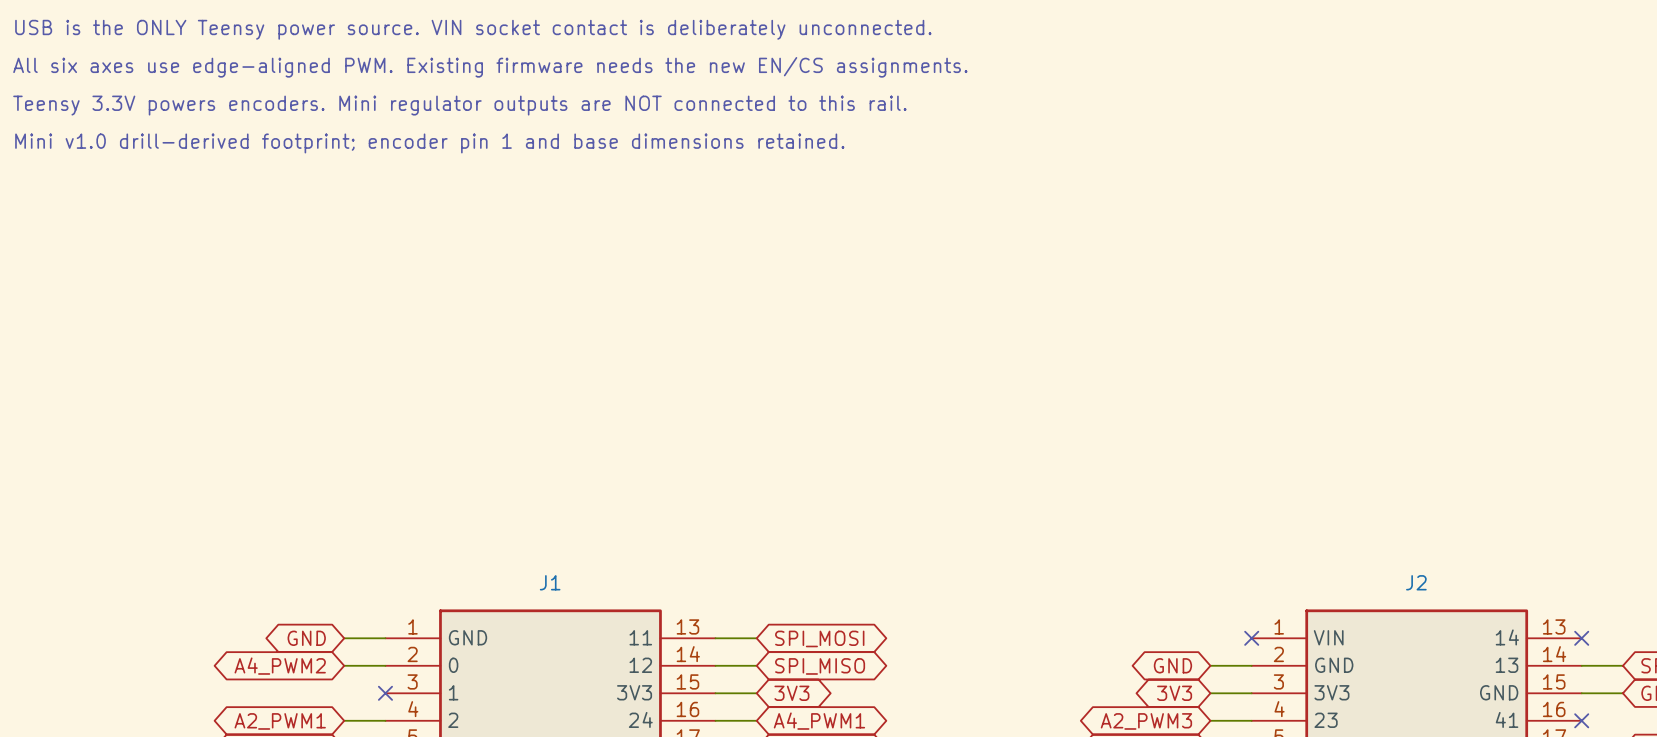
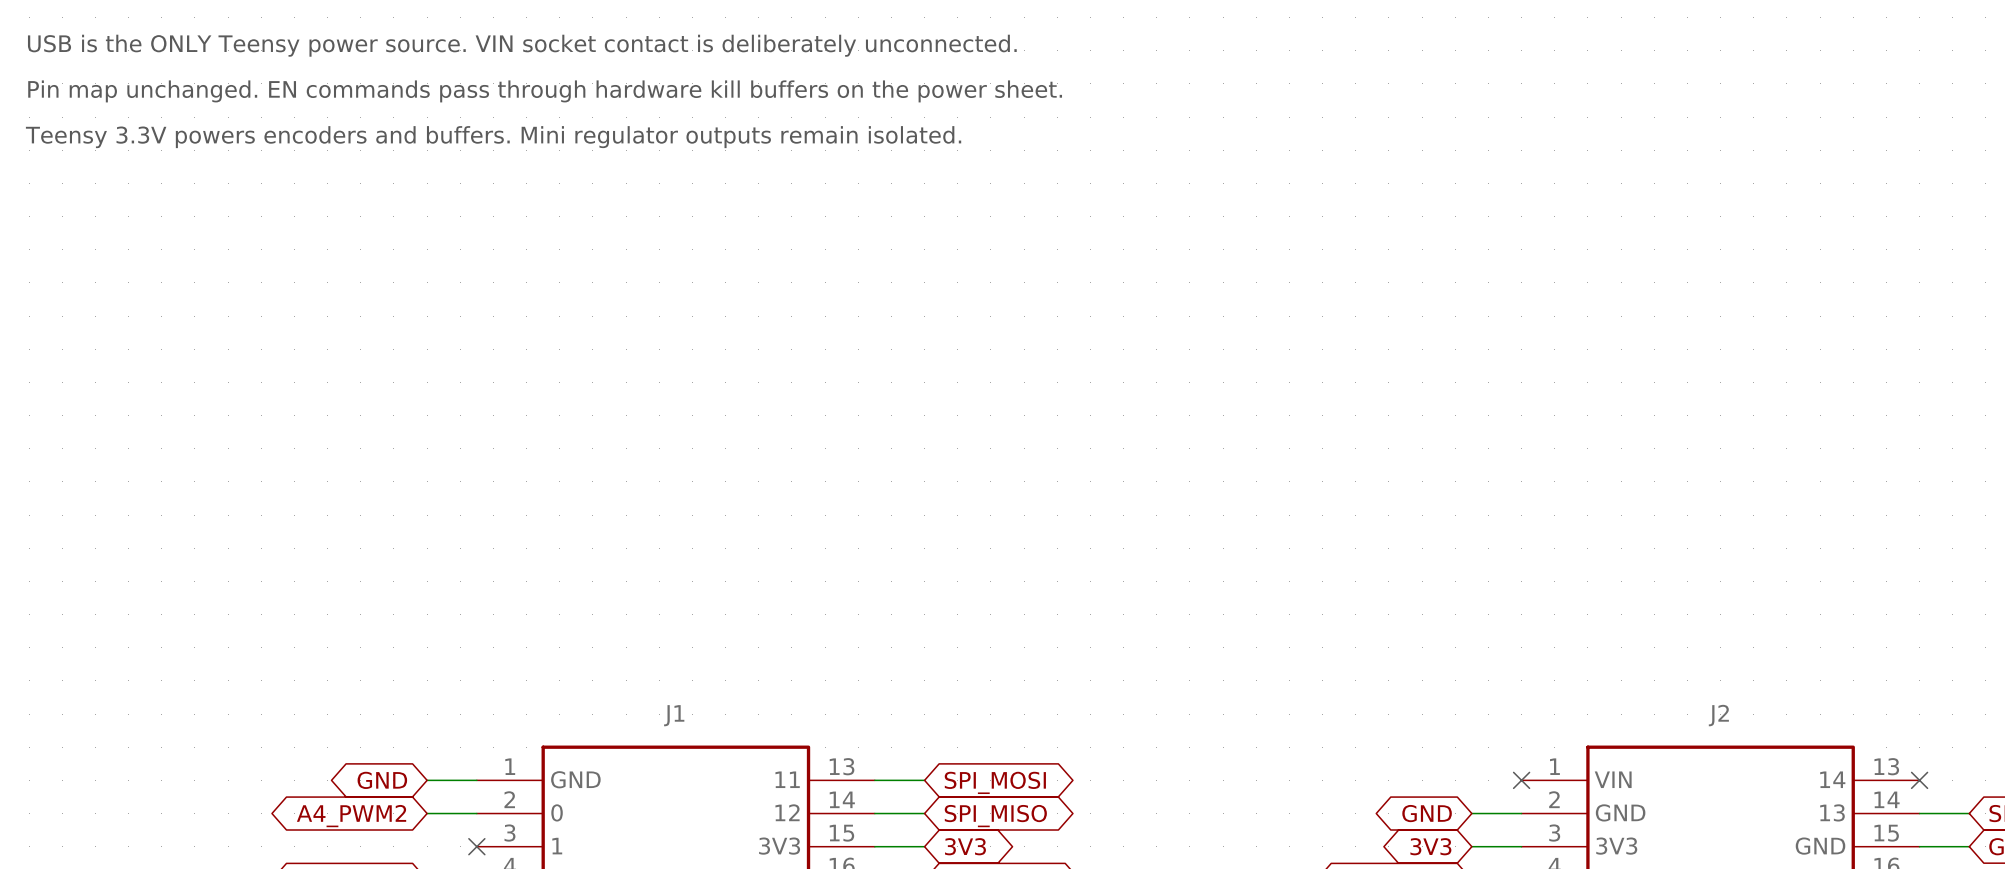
text: All six axes use edge-aligned PWM. Existing firmware needs the new EN/CS assignments. (490, 67) -> Pin map unchanged. EN commands pass through hardware kill buffers on the power sheet. (545, 91)
text: Teensy 3.3V powers encoders. Mini regulator outputs are NOT connected to this rail. (459, 105) -> Teensy 3.3V powers encoders and buffers. Mini regulator outputs remain isolated. (493, 137)
text: Mini v1.0 drill-derived footprint; encoder pin 1 and base dimensions retained. (429, 143) -> none

